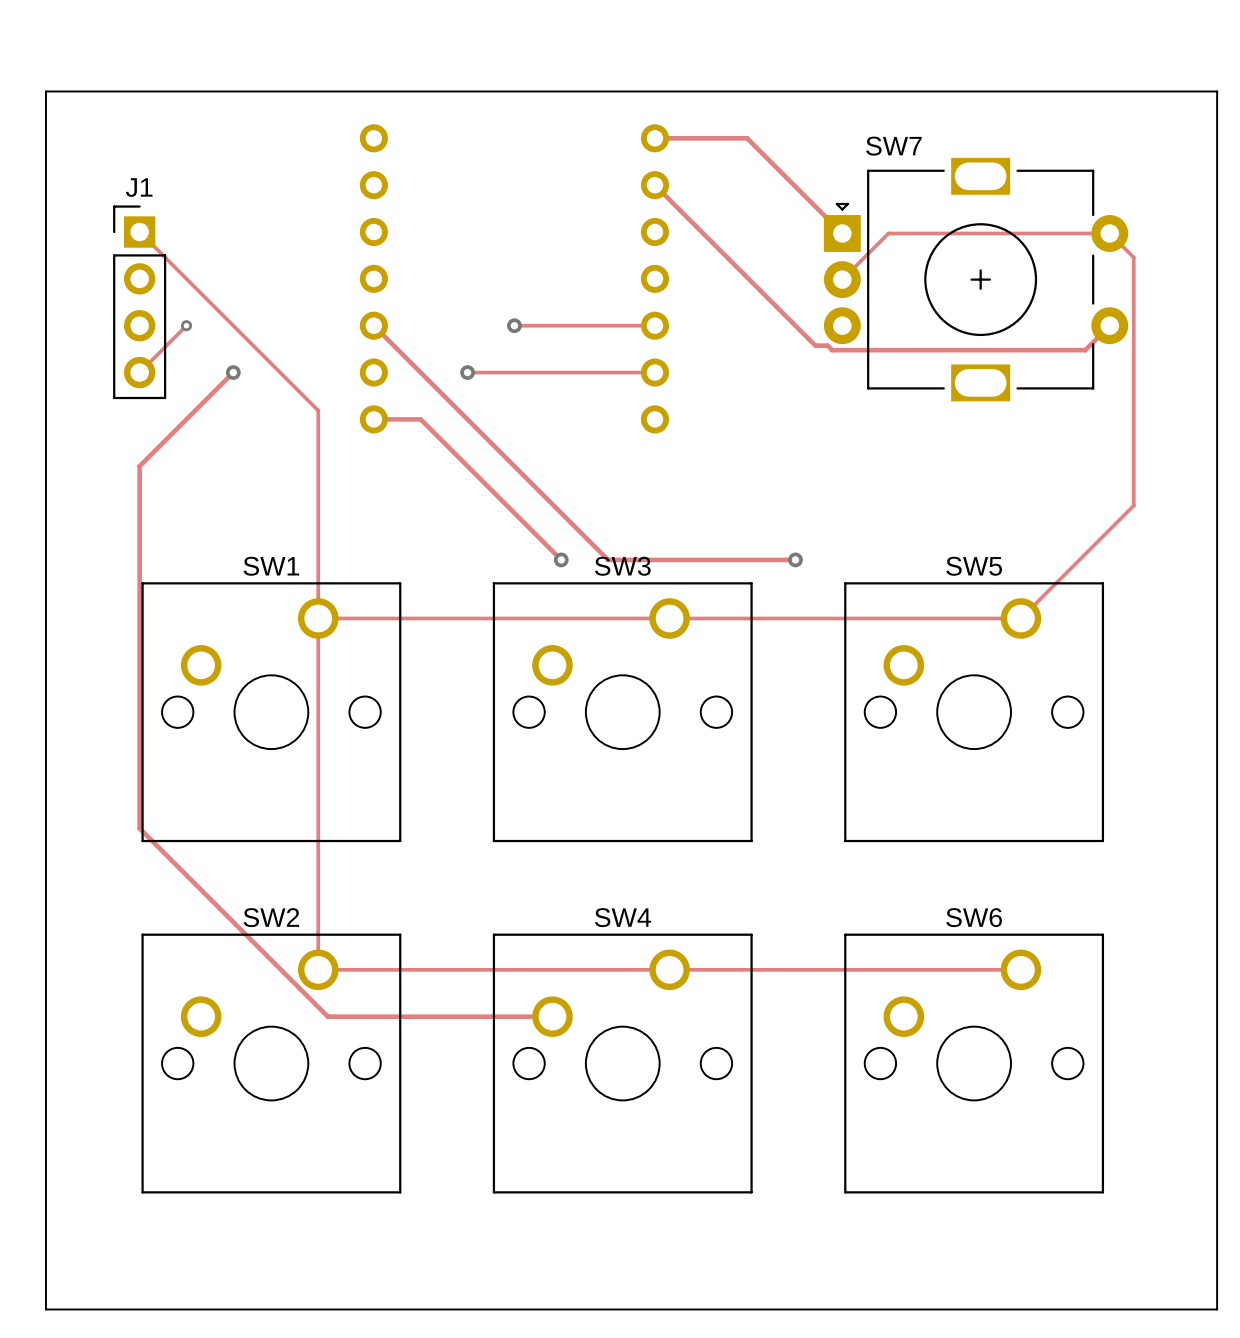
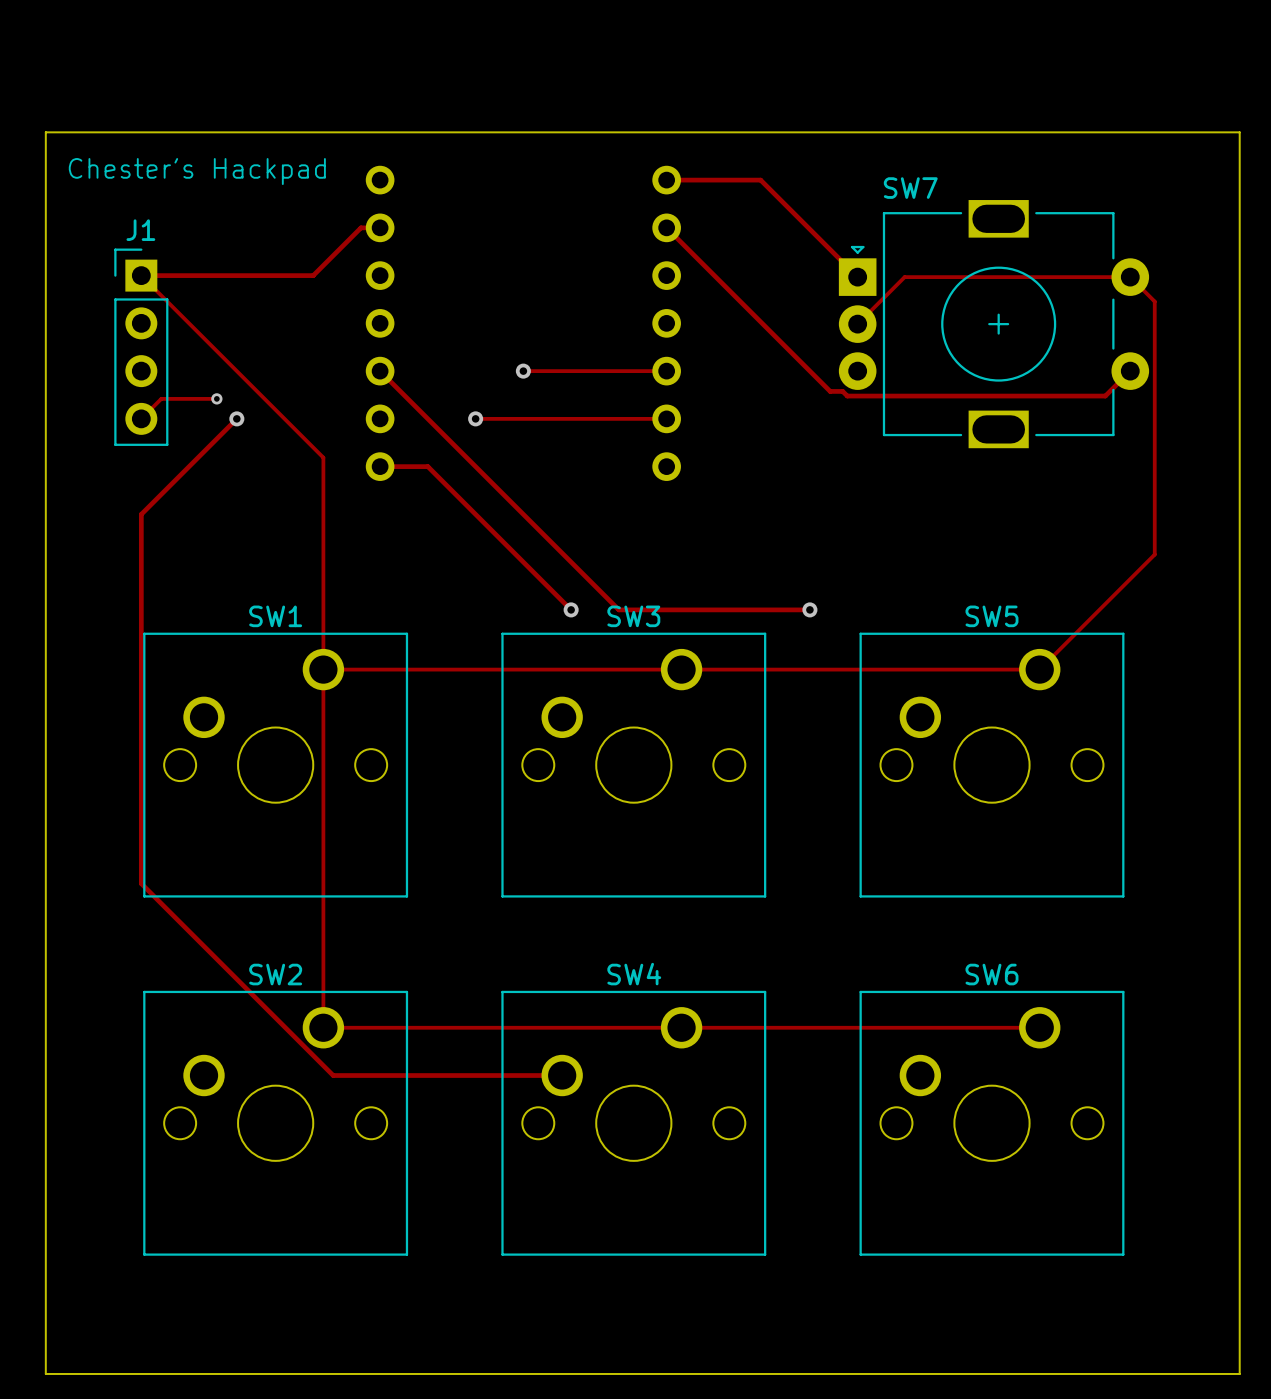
text: none -> Chester's Hackpad (197, 171)
track: none -> (380, 227) (361, 227) (313, 275) (141, 275)
track: (186, 325) (159, 352) -> (216, 398) (161, 398)
via position: (186, 325) -> (216, 398)

